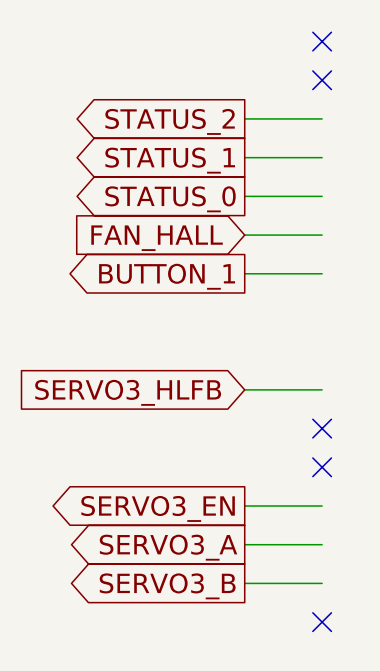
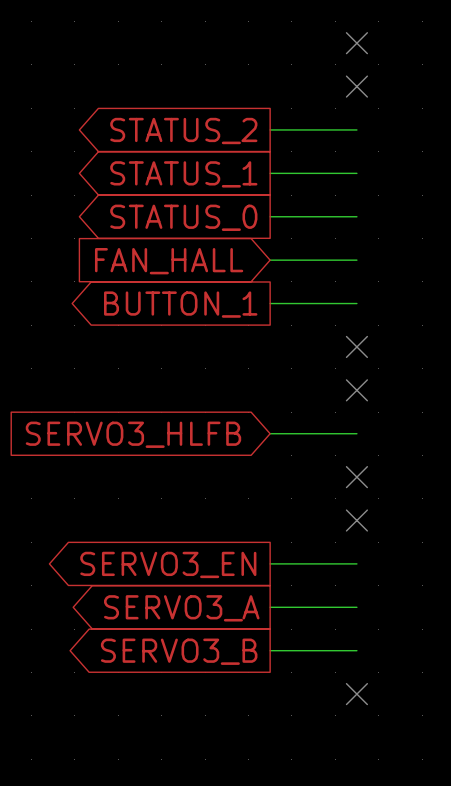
no-connect mark: none -> (356, 346)
no-connect mark: none -> (356, 390)

